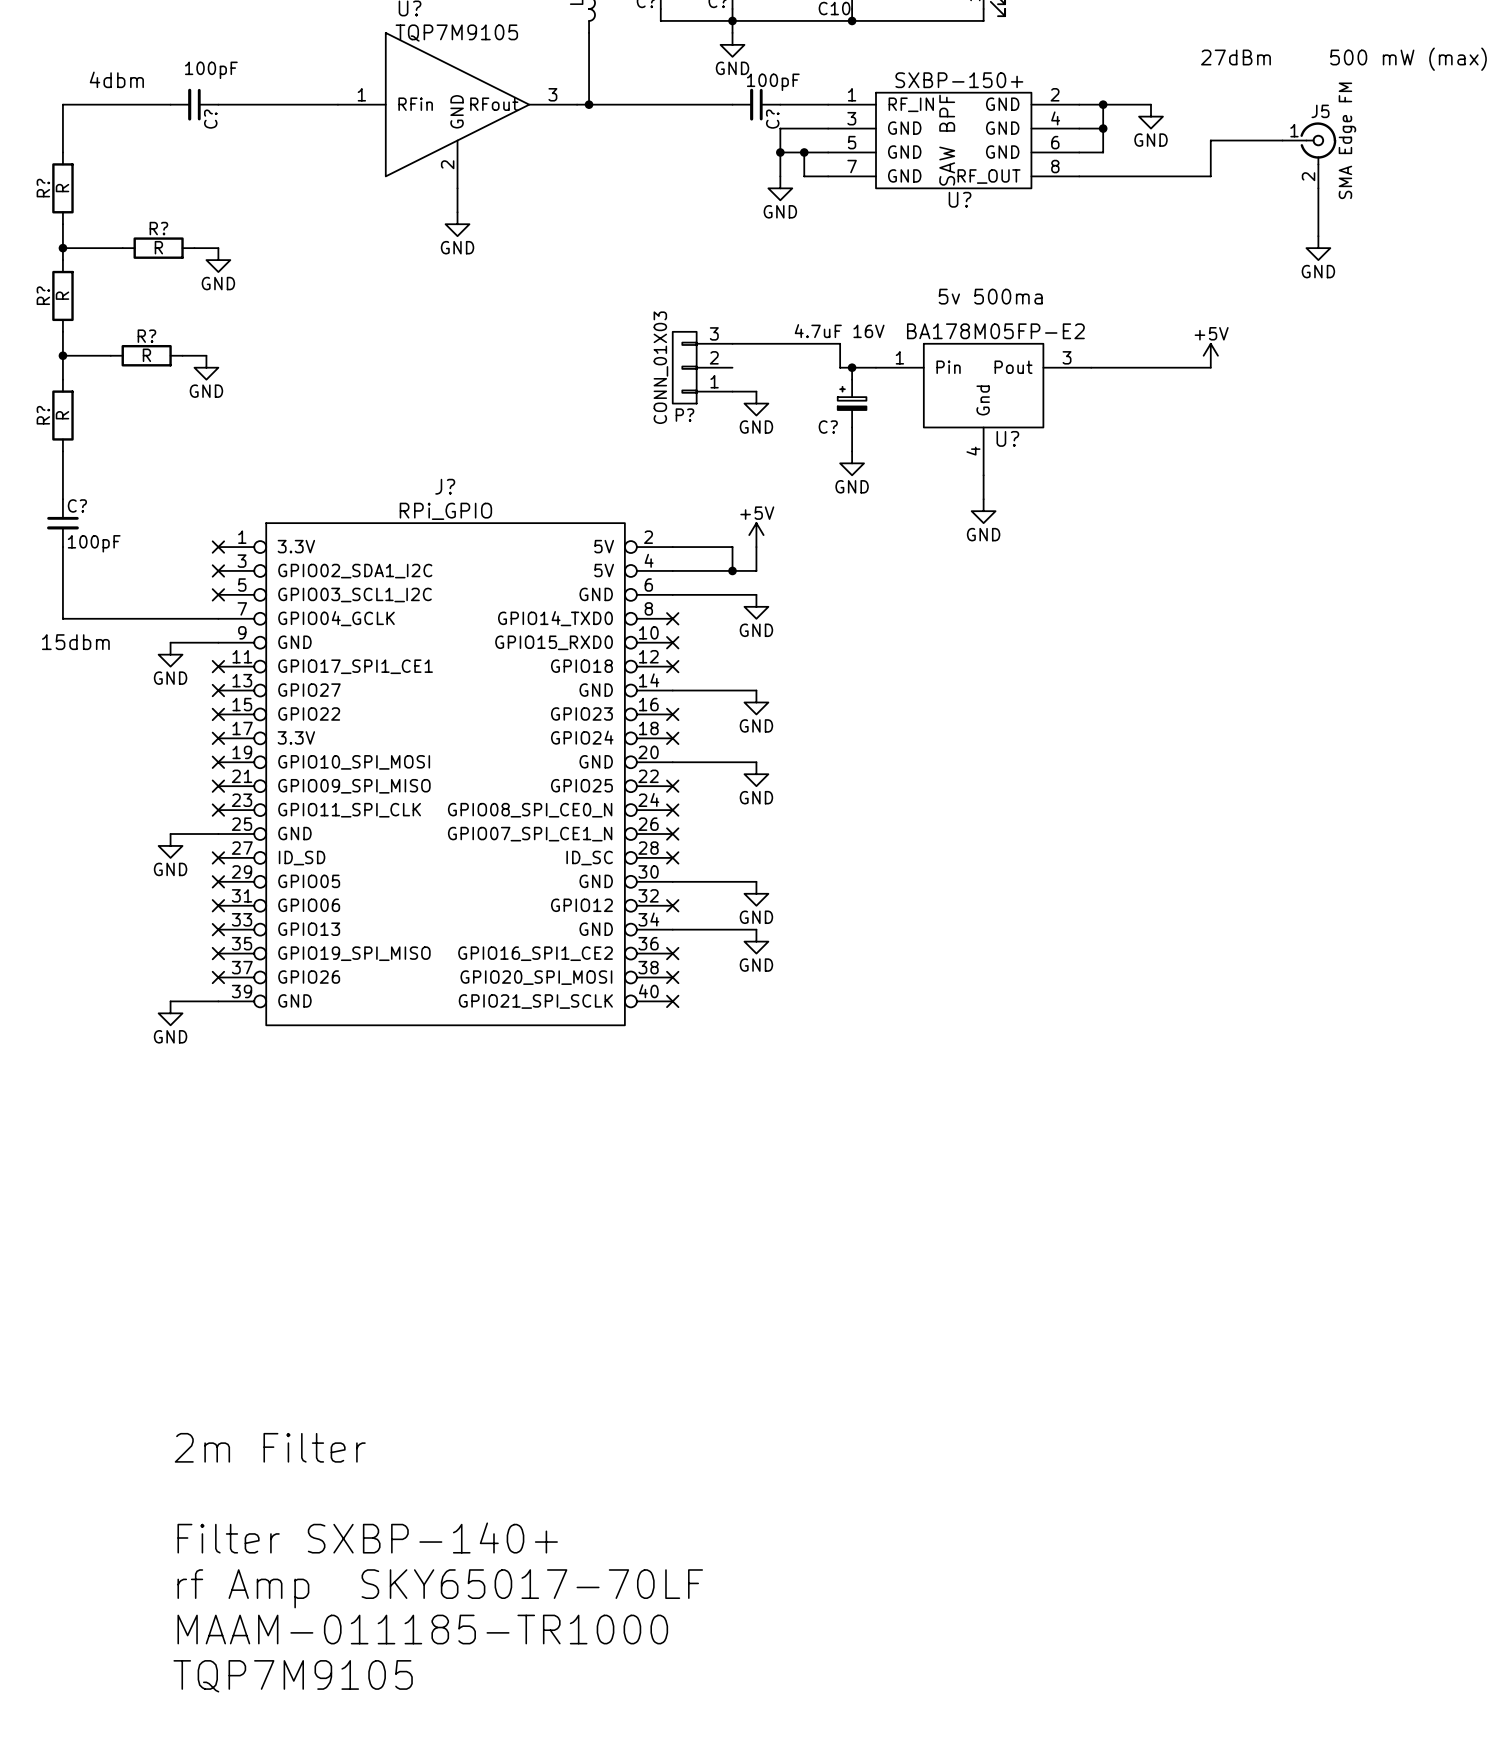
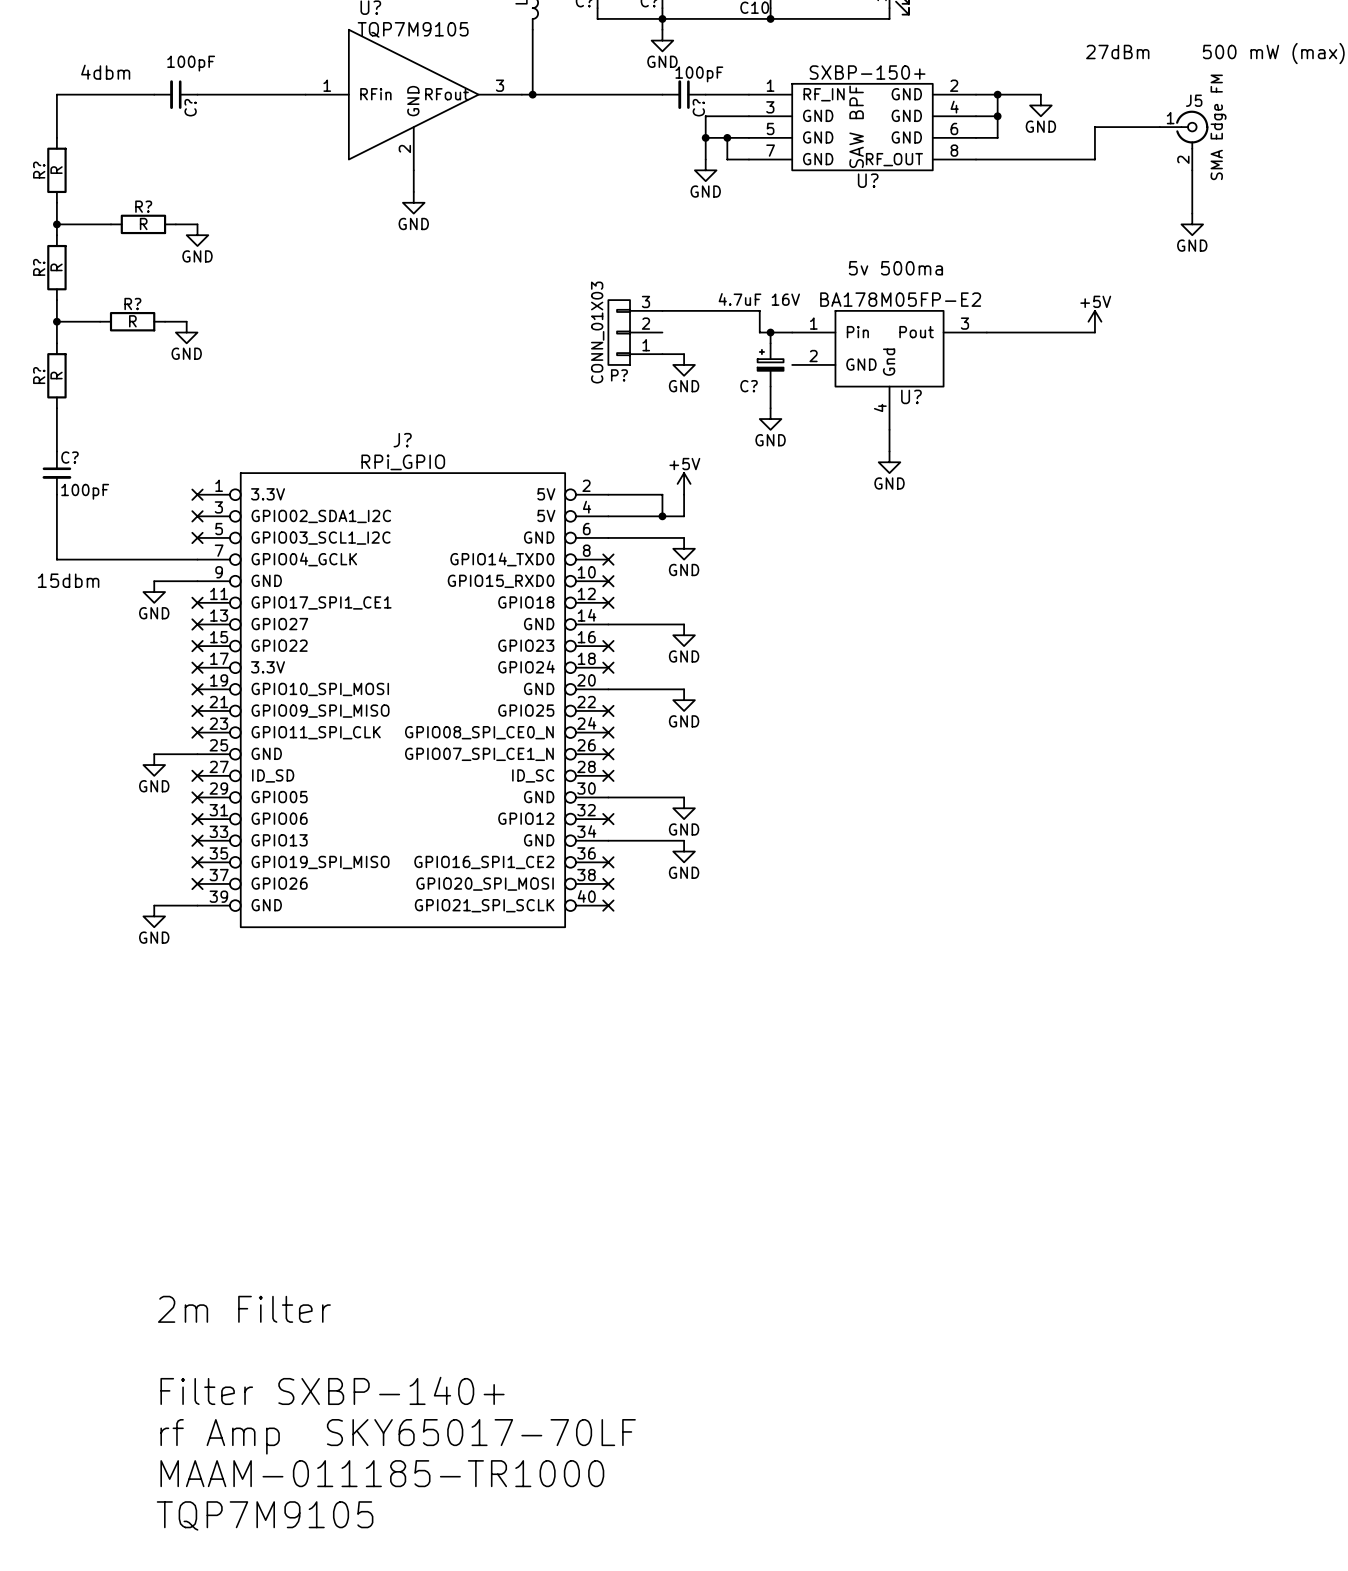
U? symbol: [876, 343, 1092, 476] -> [792, 310, 987, 430]

